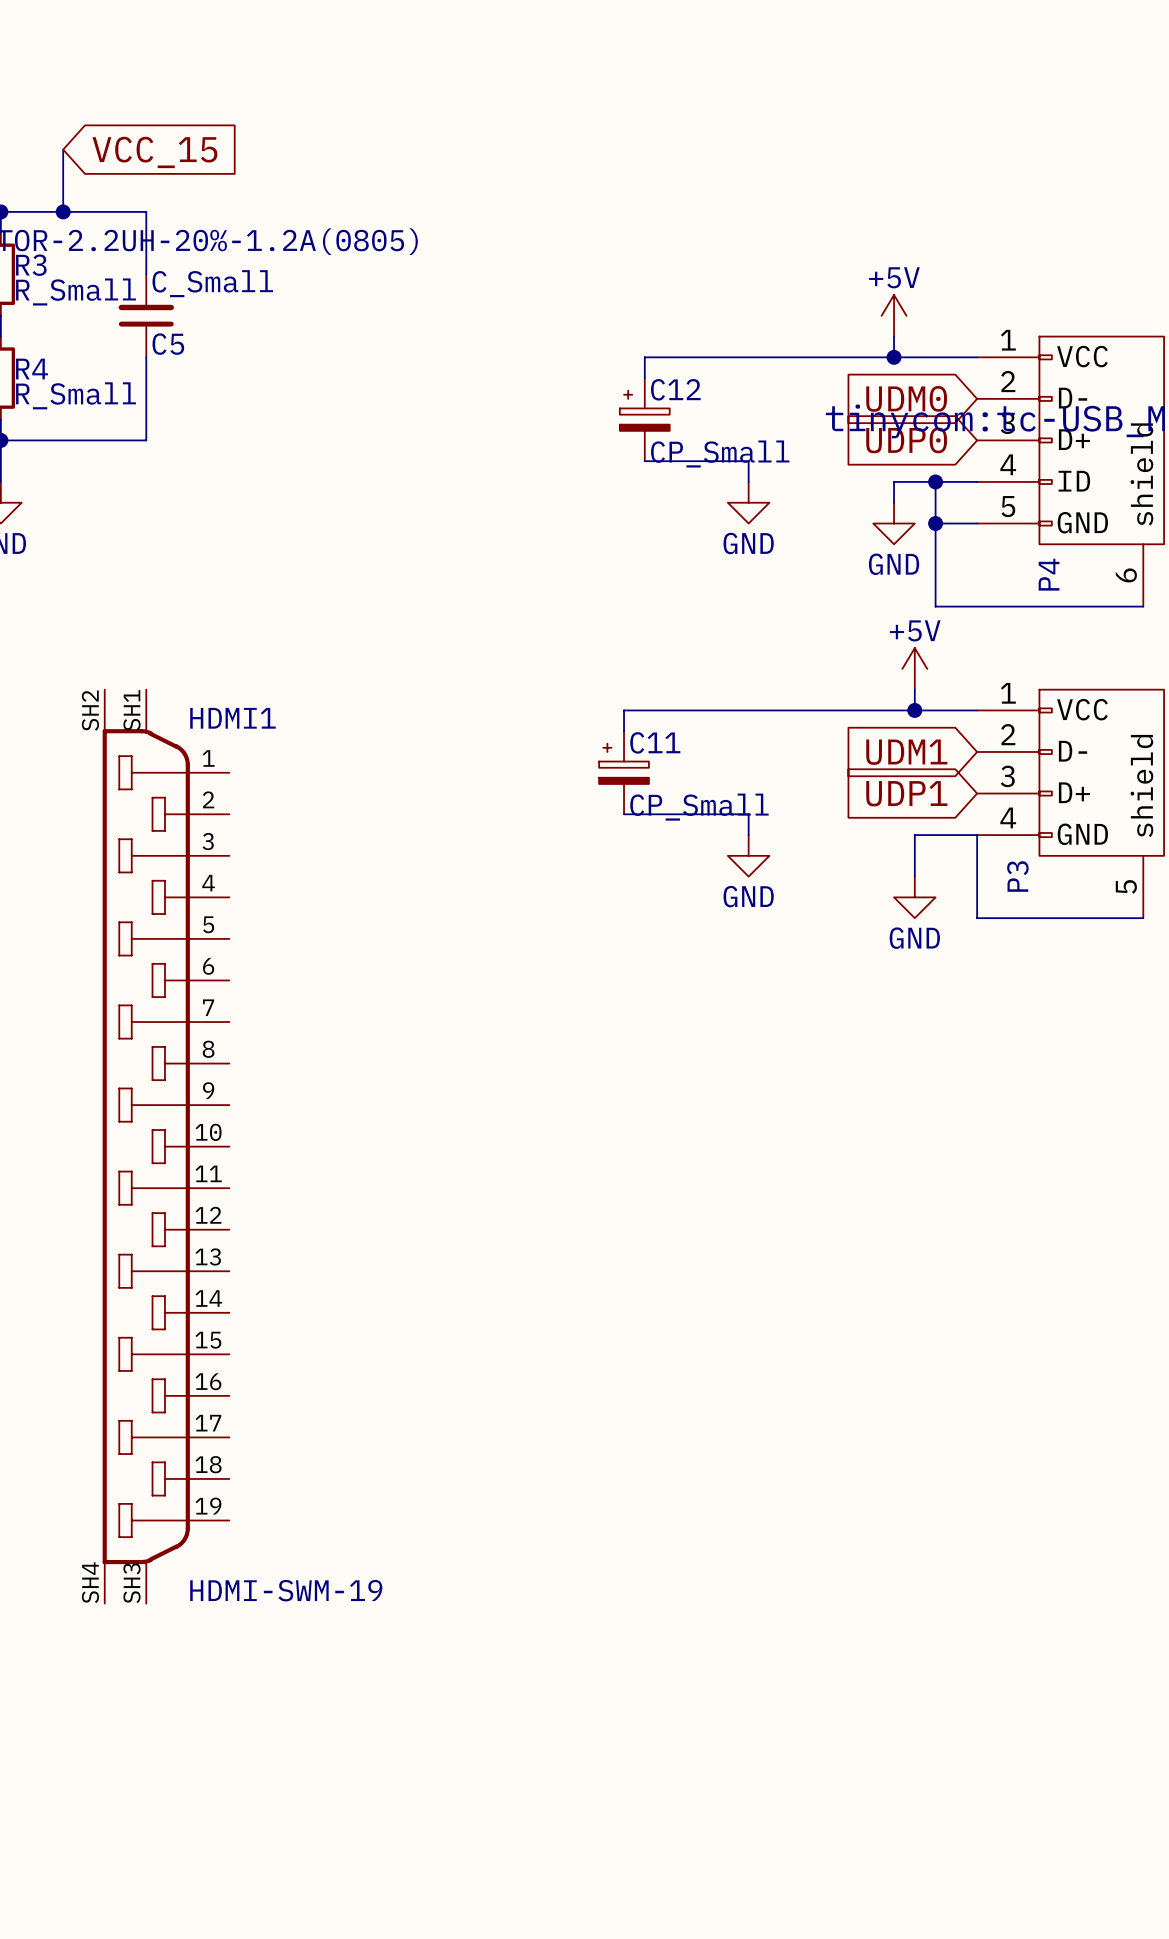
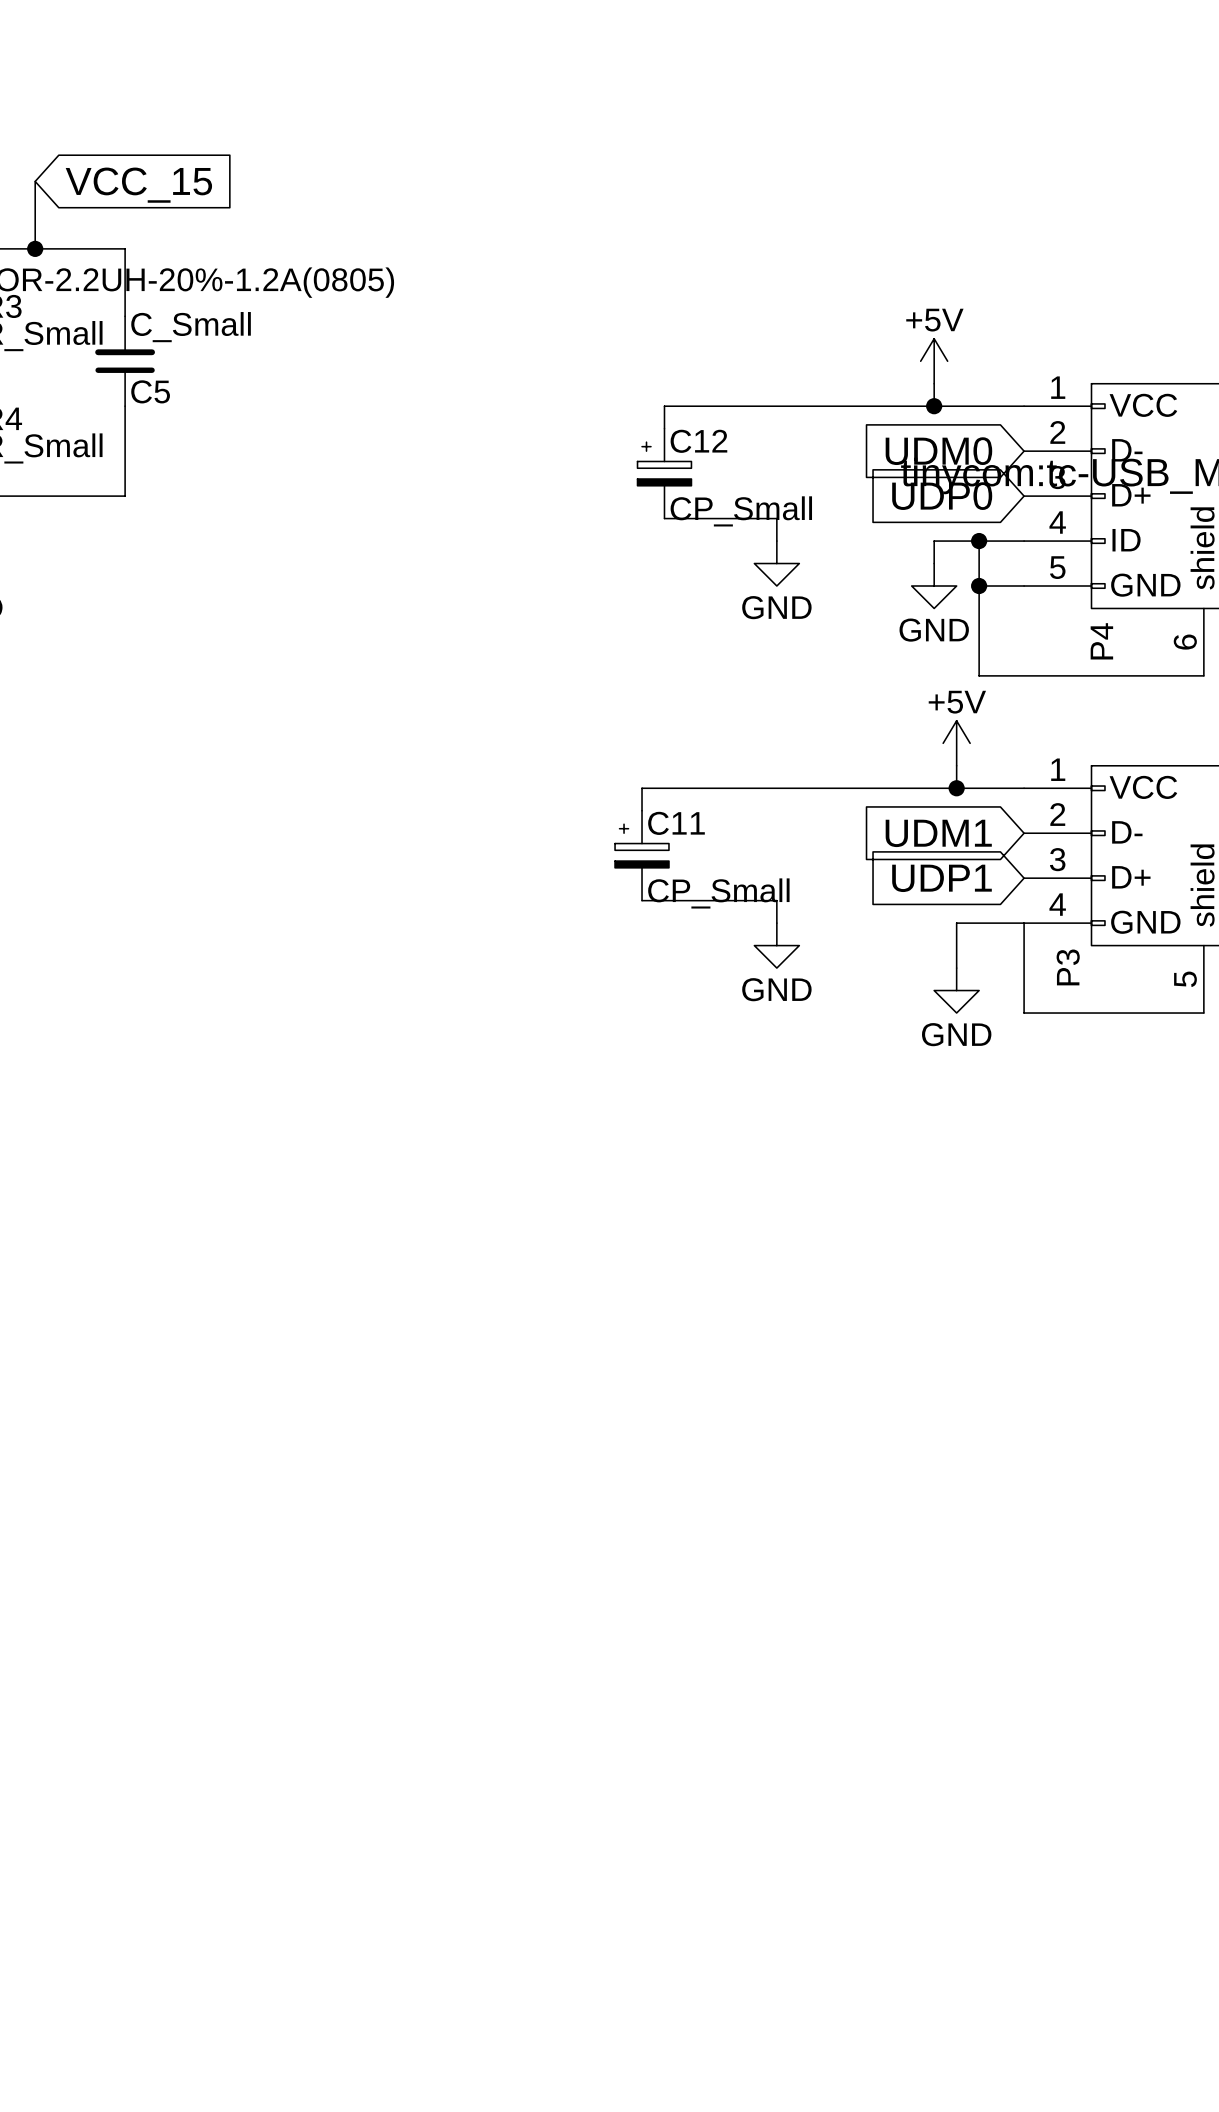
HDMI1: HDMI-SWM-19 (166, 1146) -> none

